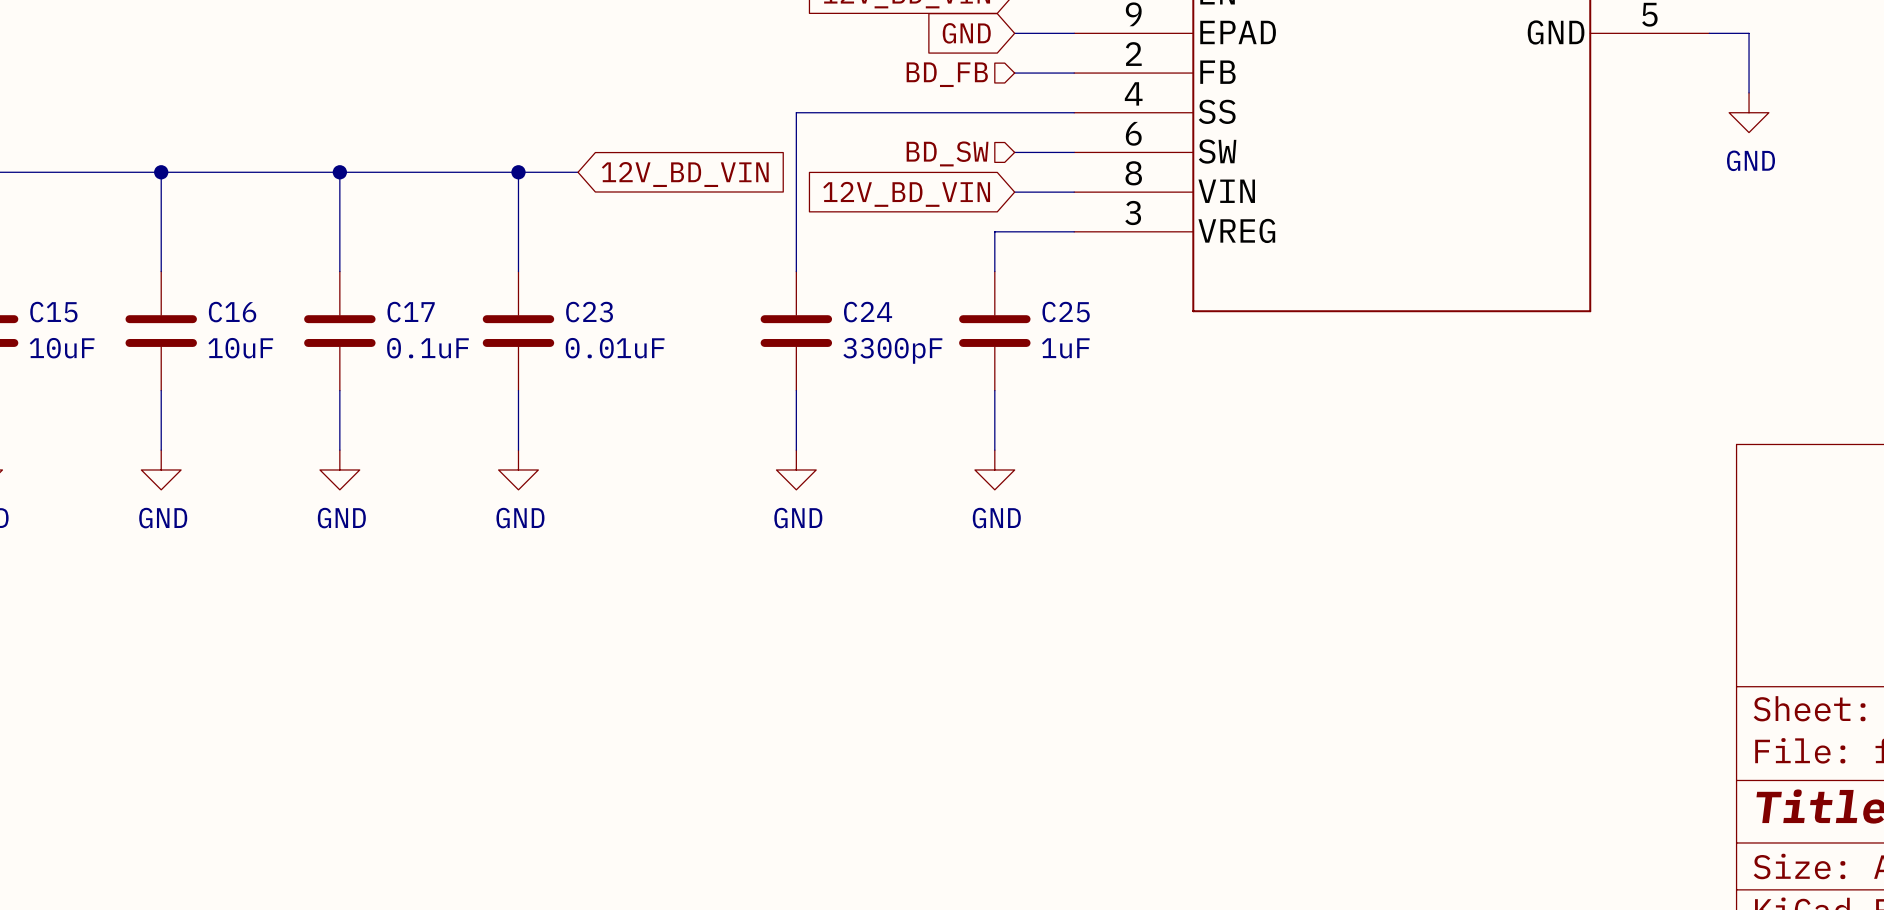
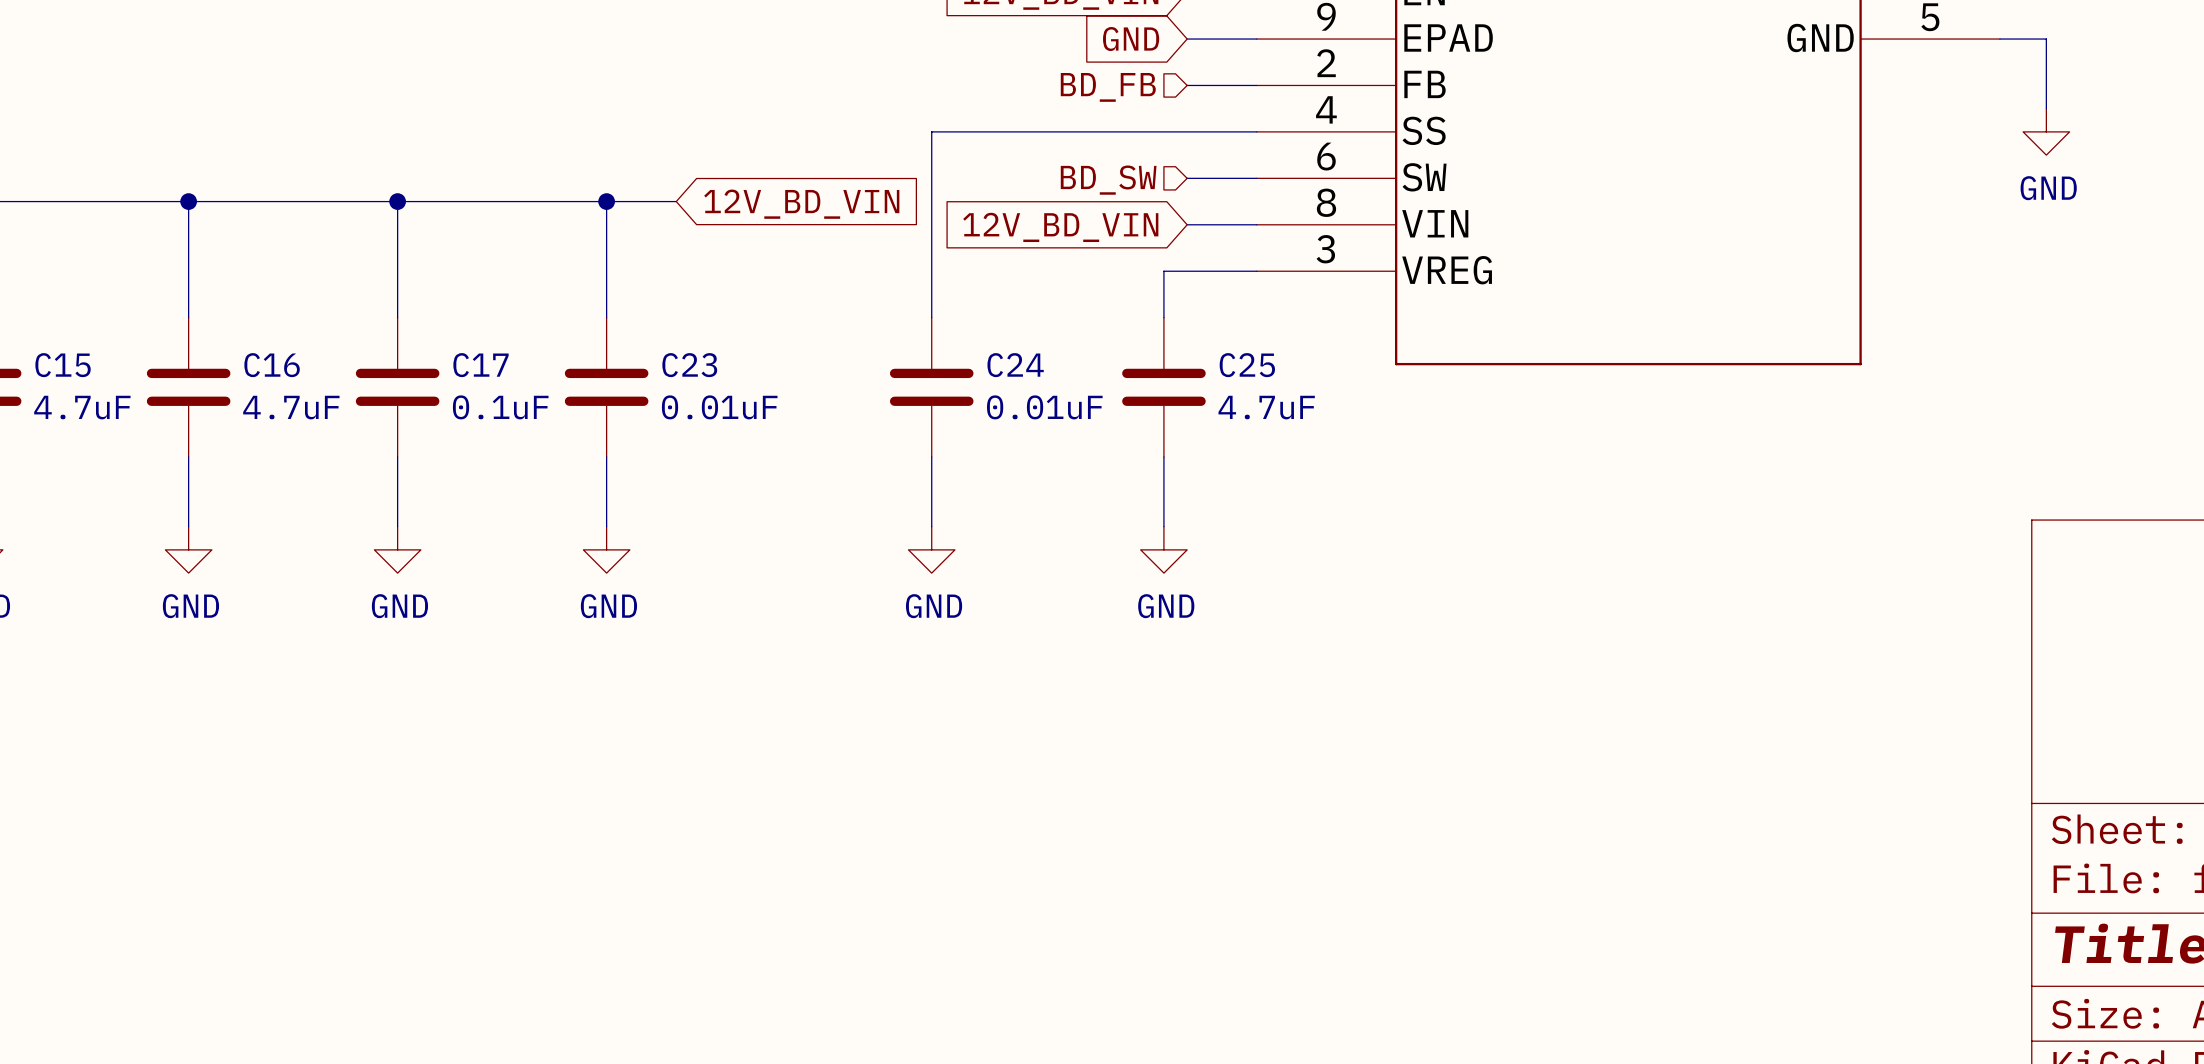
C15 value: 10uF (62, 348) -> 4.7uF (82, 407)
C16 value: 10uF (240, 348) -> 4.7uF (291, 407)
C25 value: 1uF (1065, 348) -> 4.7uF (1266, 407)
C24 value: 3300pF (892, 350) -> 0.01uF (1044, 407)

